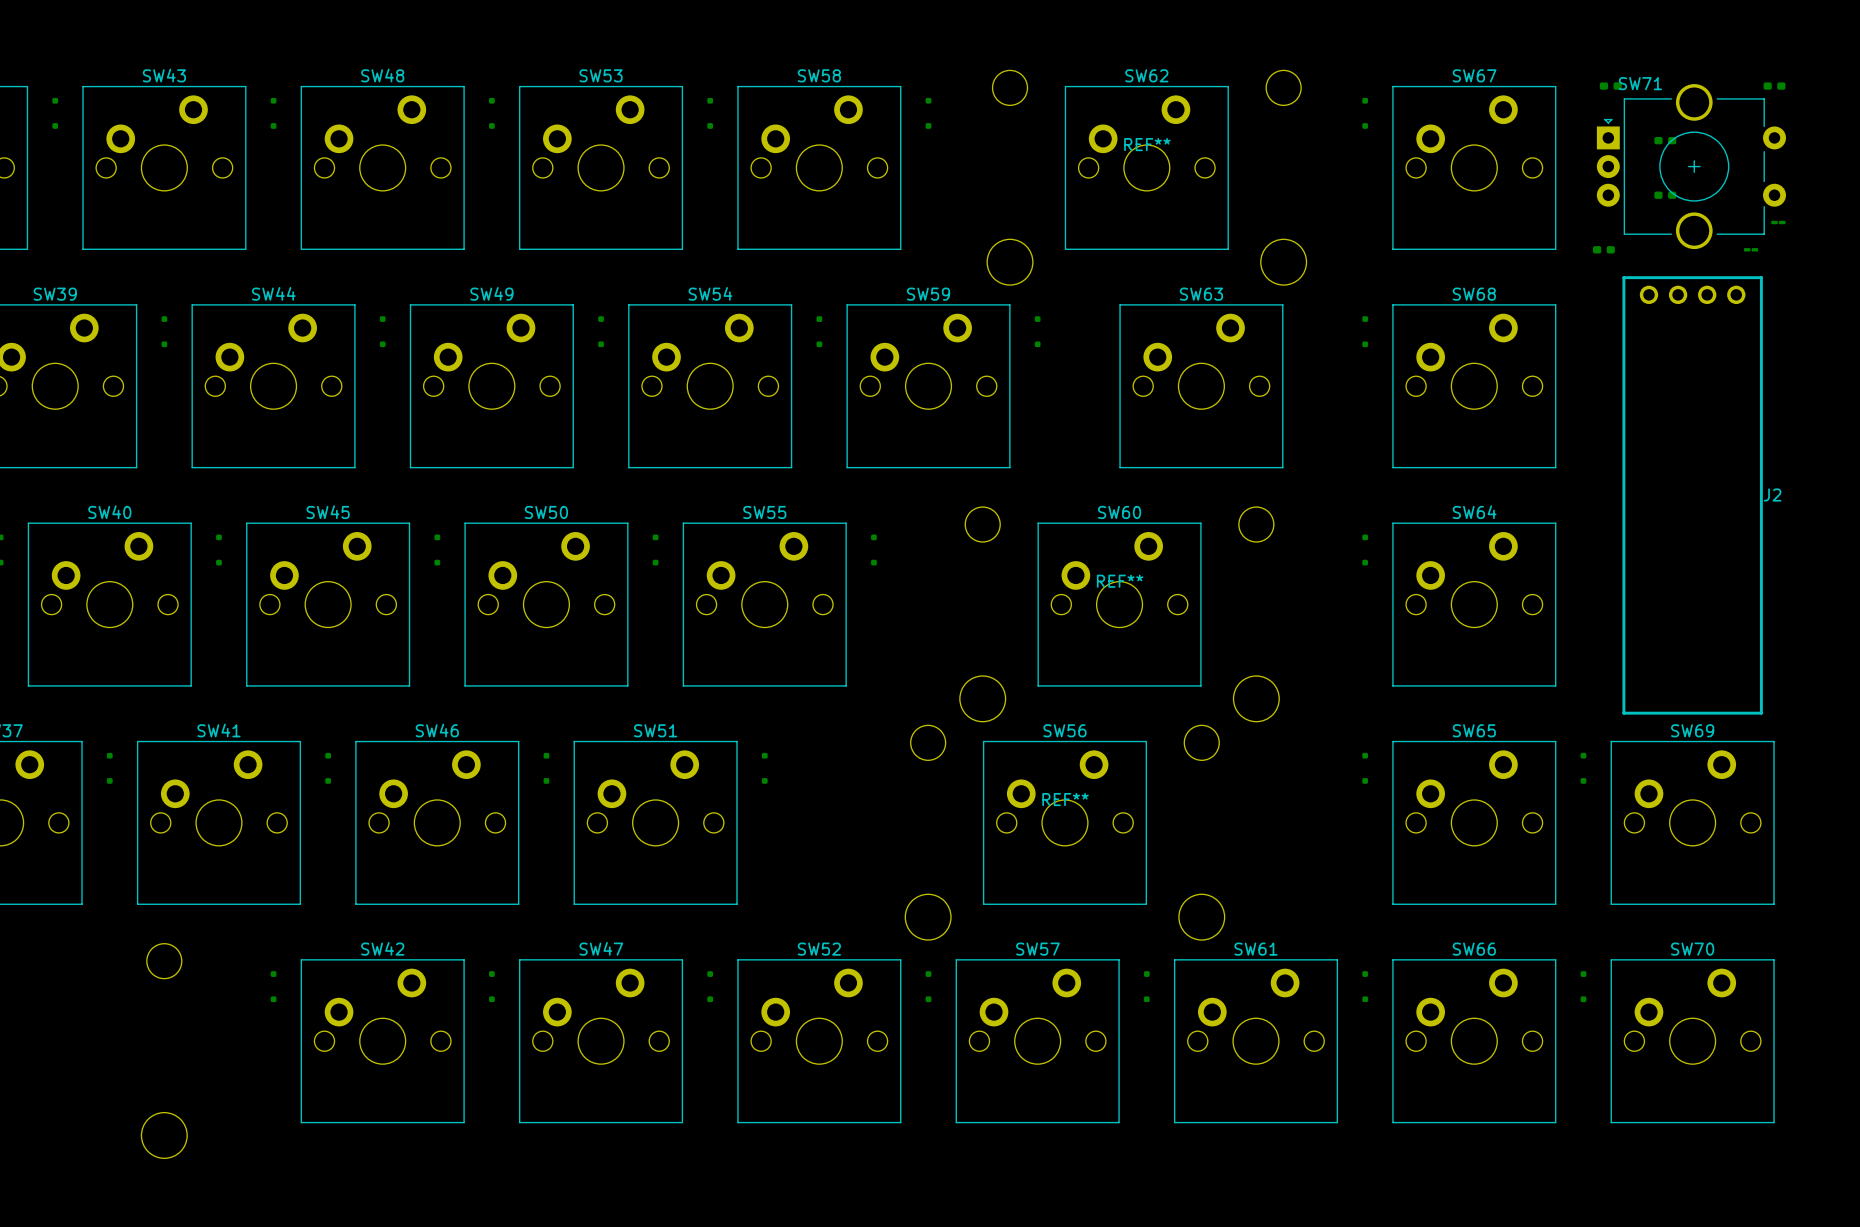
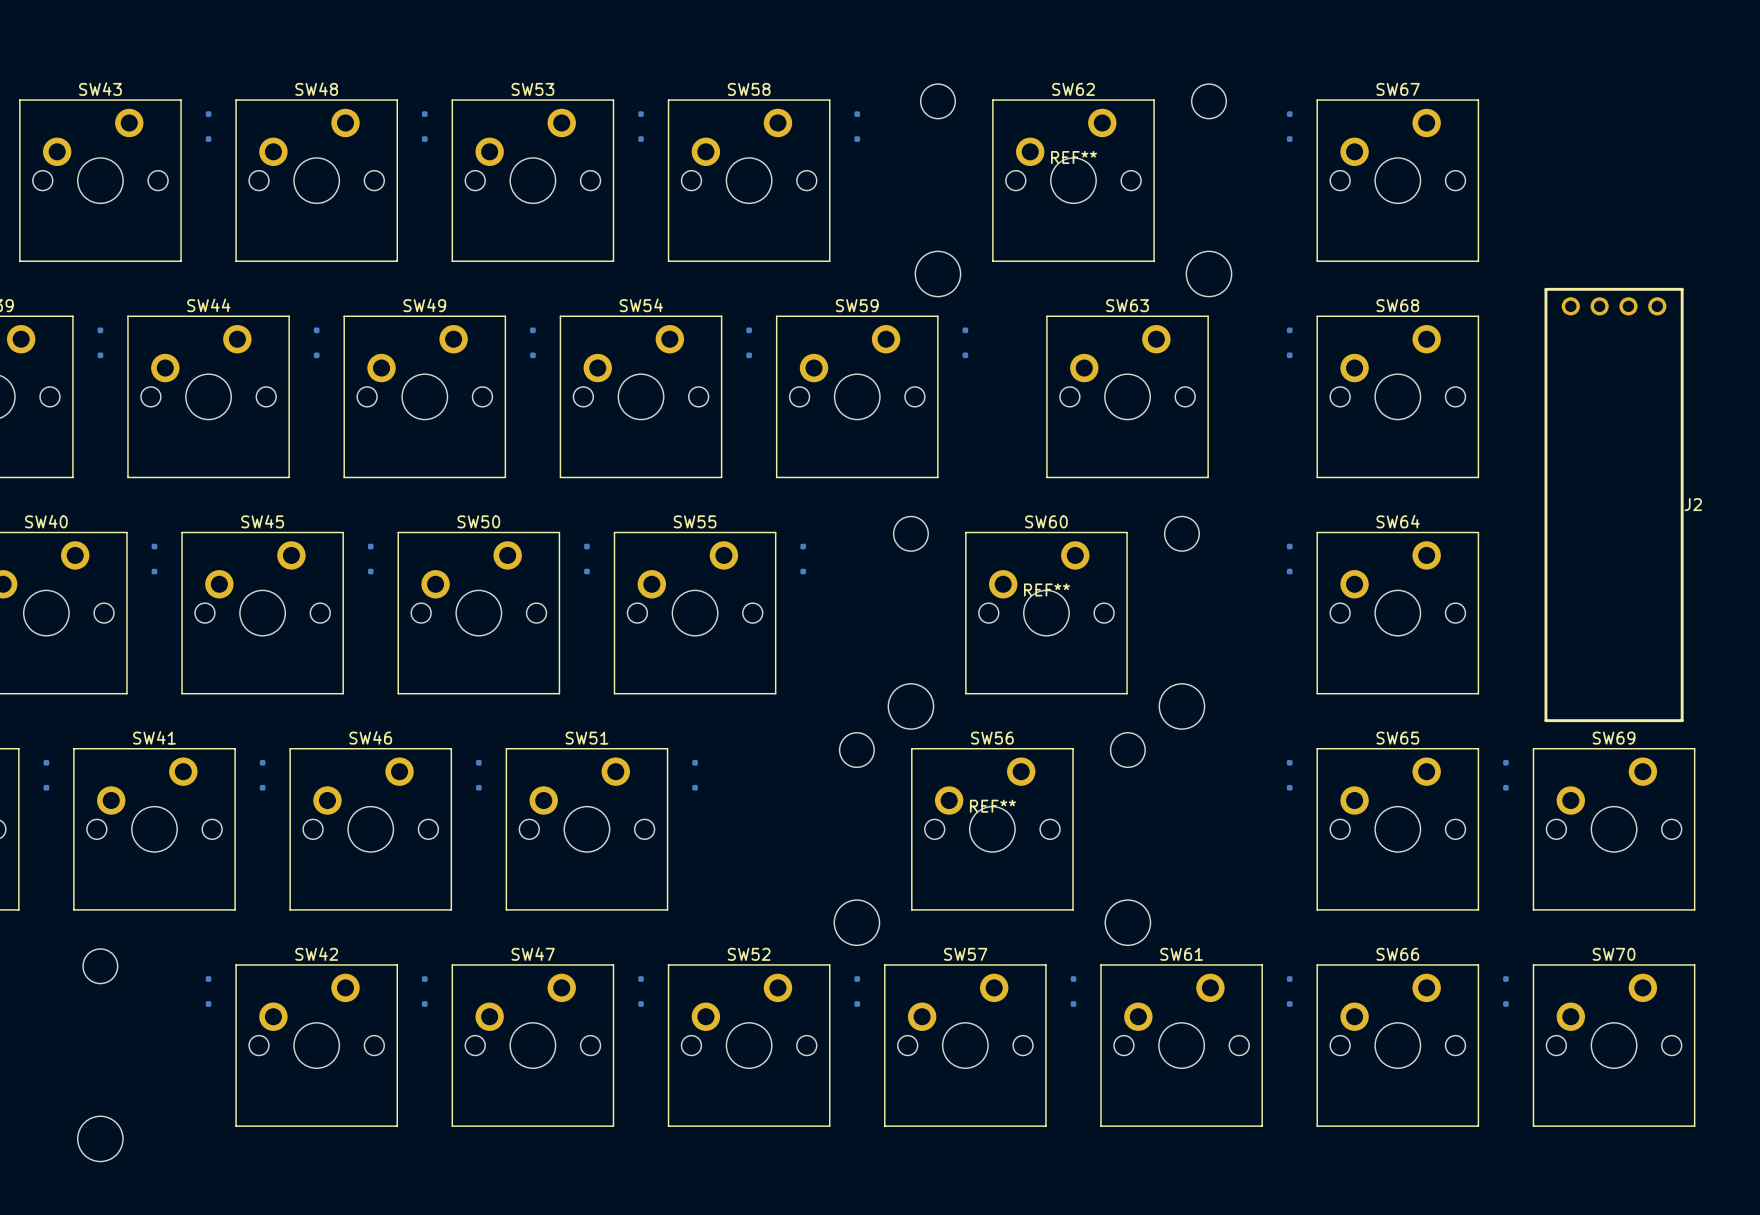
part: (1610, 86) -> none
part: (1774, 86) -> none
part: (1665, 140) -> none
SW71: (1691, 166) -> none
part: (1665, 195) -> none
part: (1778, 222) -> none
part: (1603, 249) -> none
part: (1751, 249) -> none

